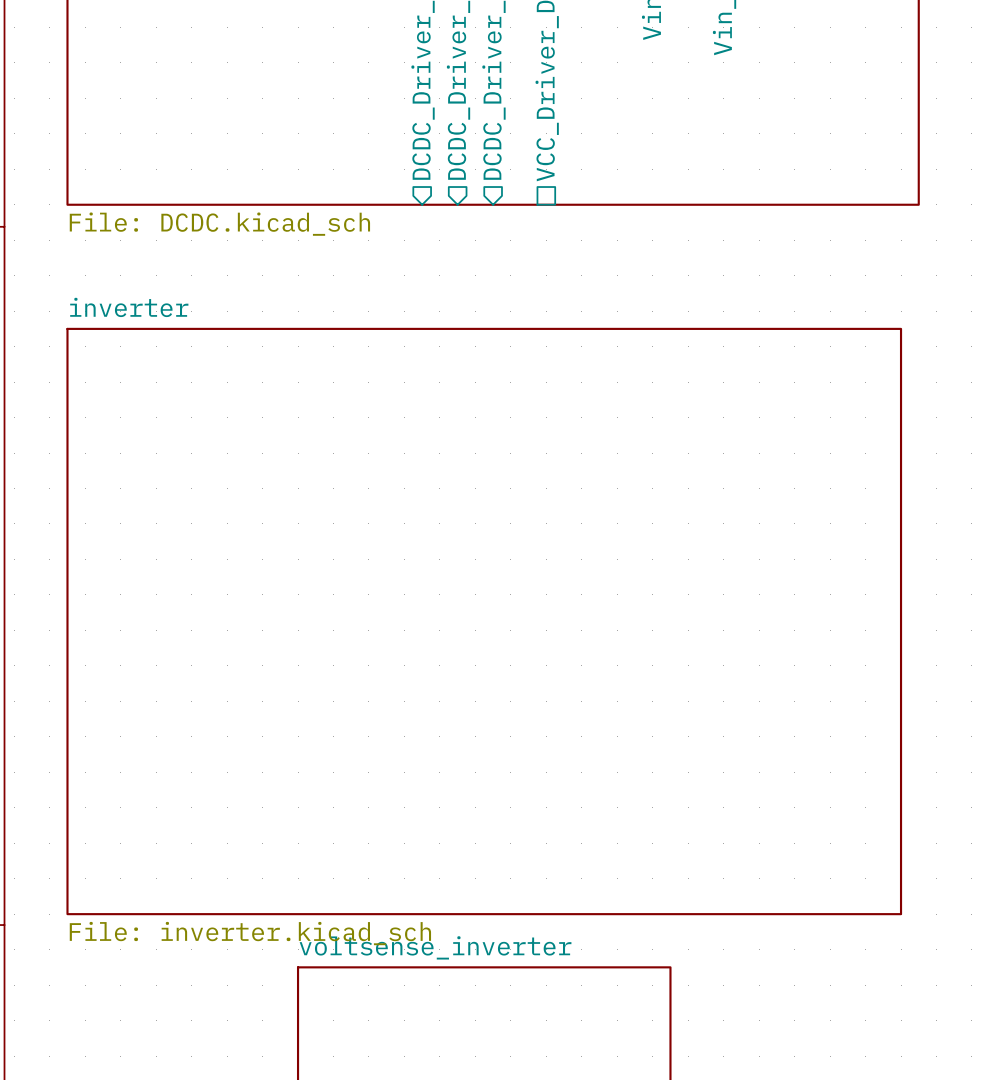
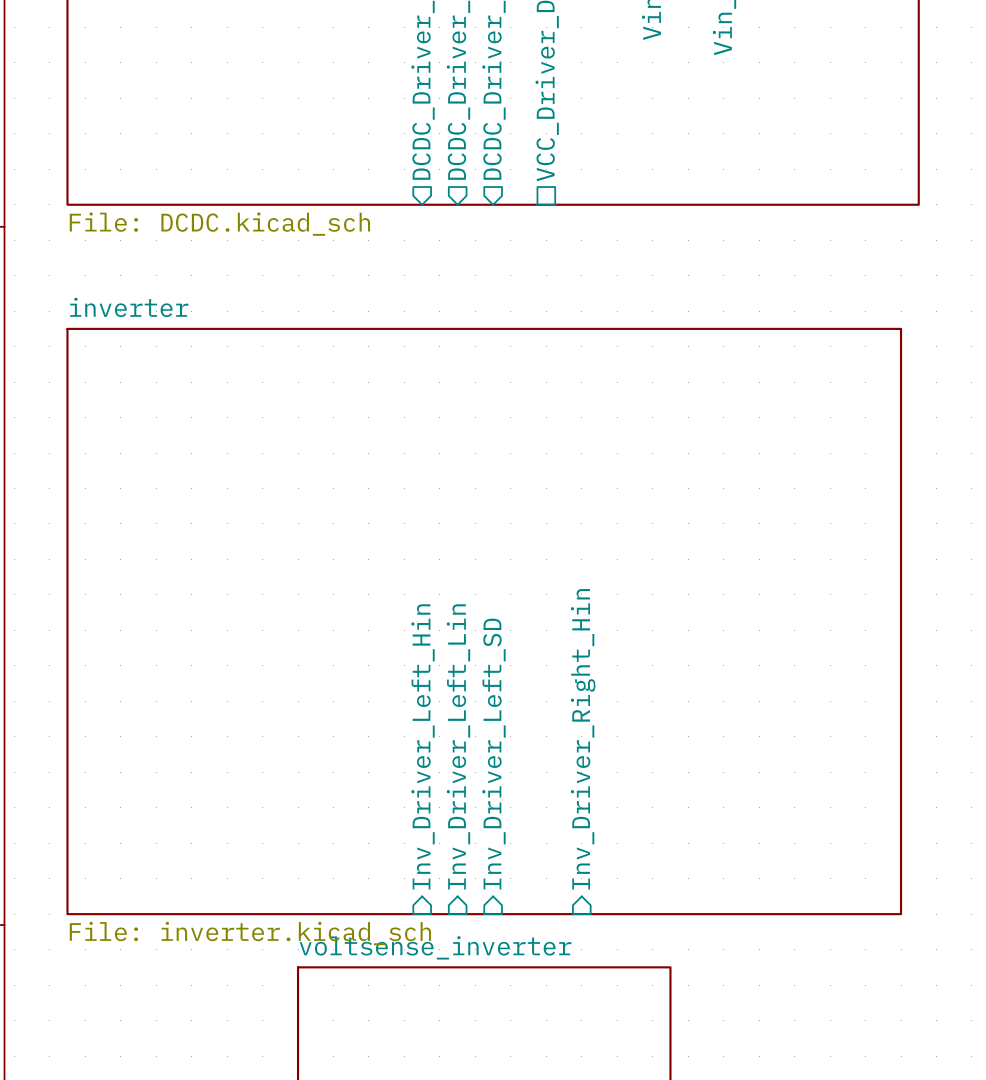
sheet pin: none -> Inv_Driver_Right_Hin (583, 739)
sheet pin: none -> Inv_Driver_Left_Hin (423, 746)
sheet pin: none -> Inv_Driver_Left_Lin (458, 746)
sheet pin: none -> Inv_Driver_Left_SD (493, 754)

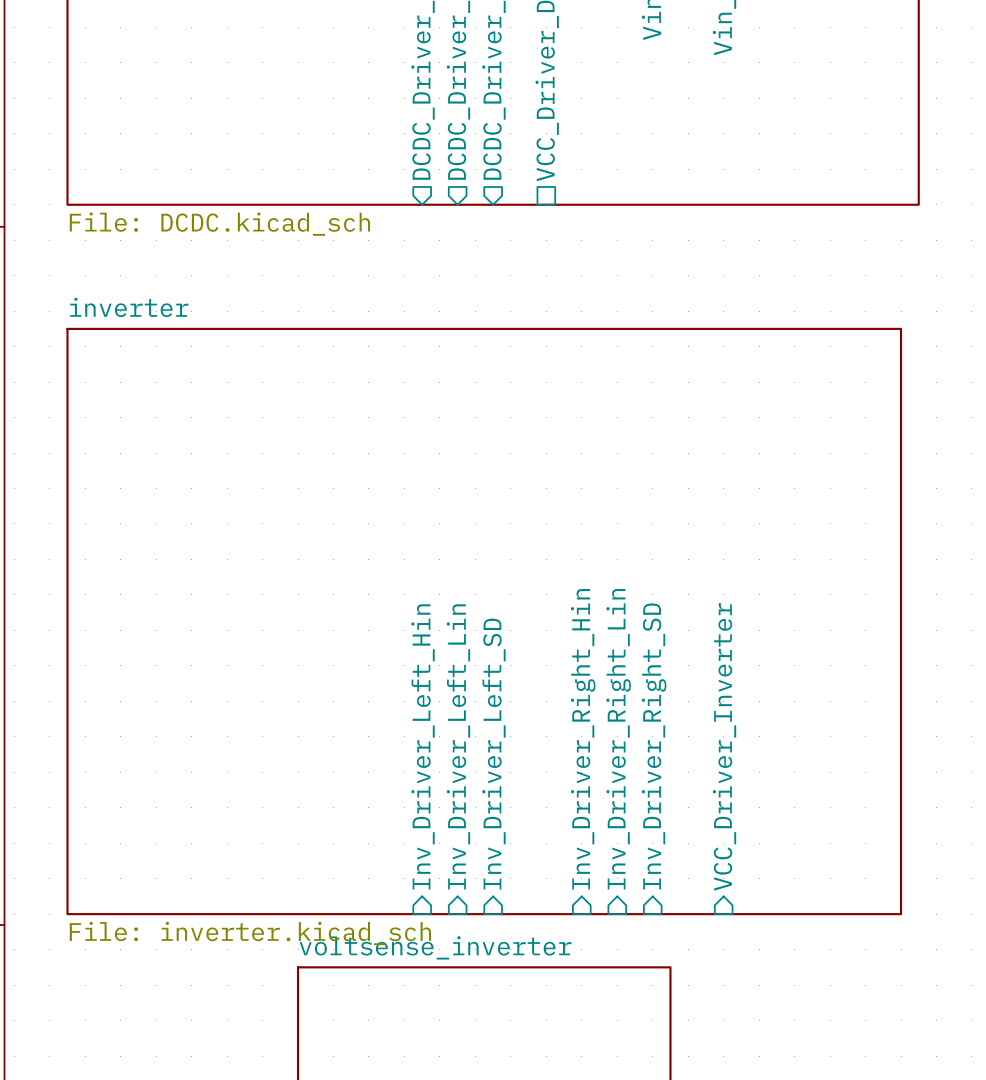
sheet pin: none -> Inv_Driver_Right_Lin (618, 739)
sheet pin: none -> Inv_Driver_Right_SD (654, 746)
sheet pin: none -> VCC_Driver_Inverter (724, 746)

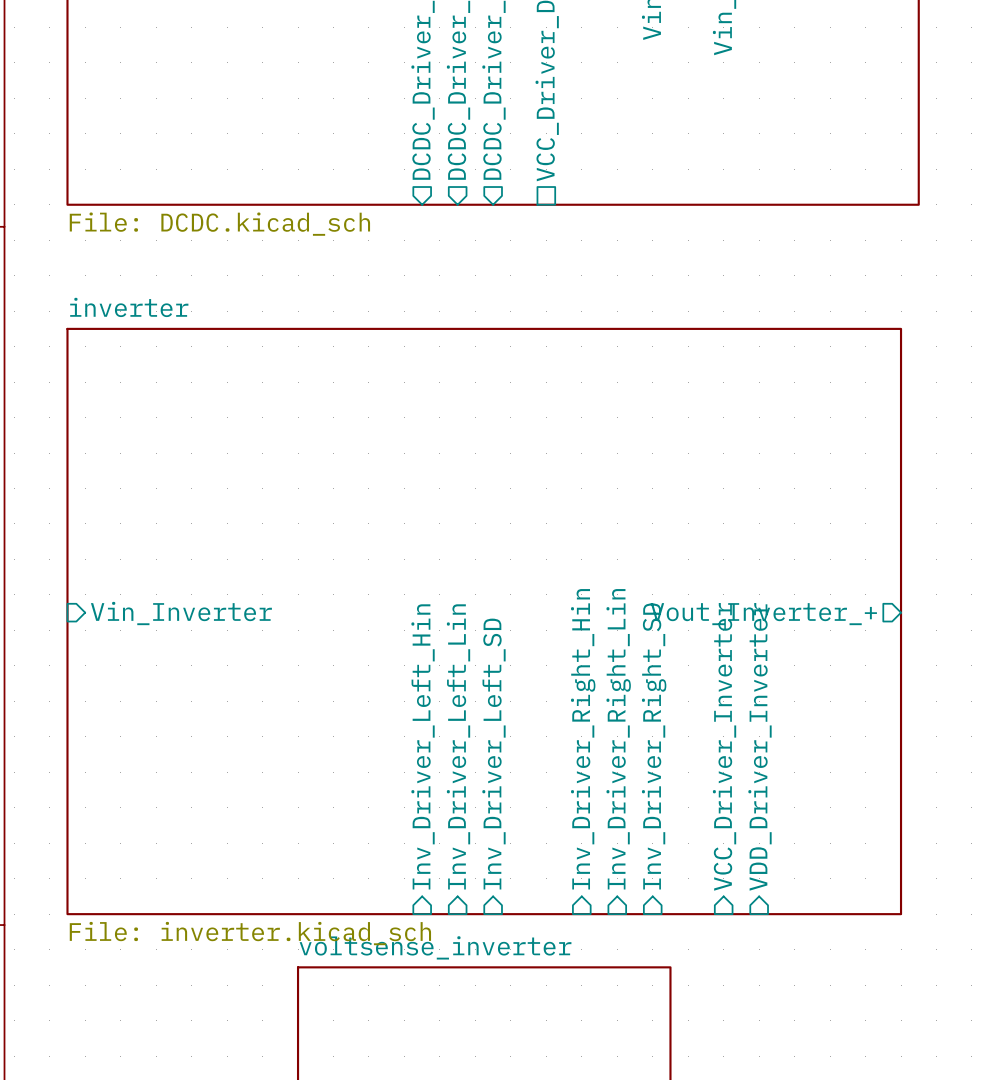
sheet pin: none -> Vin_Inverter (181, 613)
sheet pin: none -> Vout_Inverter_+ (763, 614)
sheet pin: none -> VDD_Driver_Inverter (759, 746)

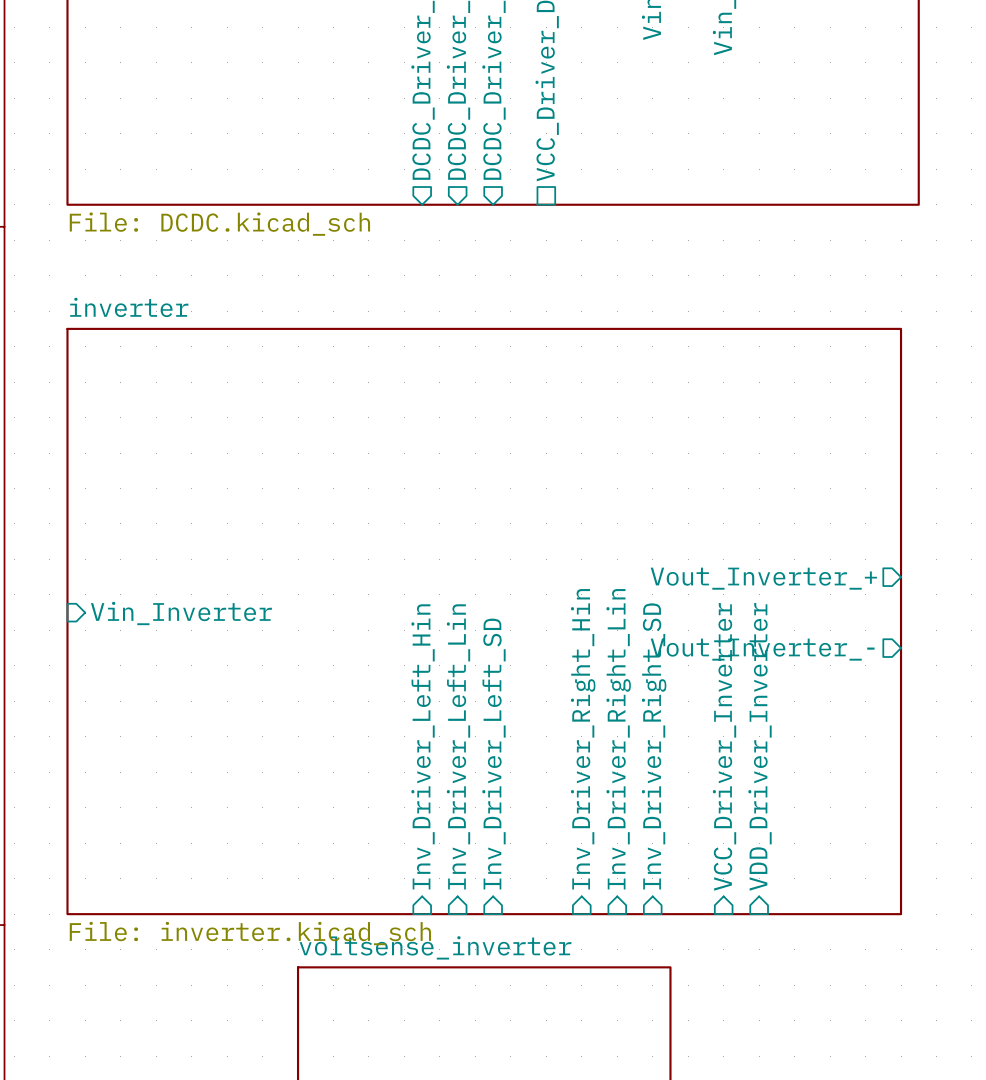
sheet pin position: Vout_Inverter_+ (763, 614) -> Vout_Inverter_+ (763, 578)
sheet pin: none -> Vout_Inverter_- (762, 649)

